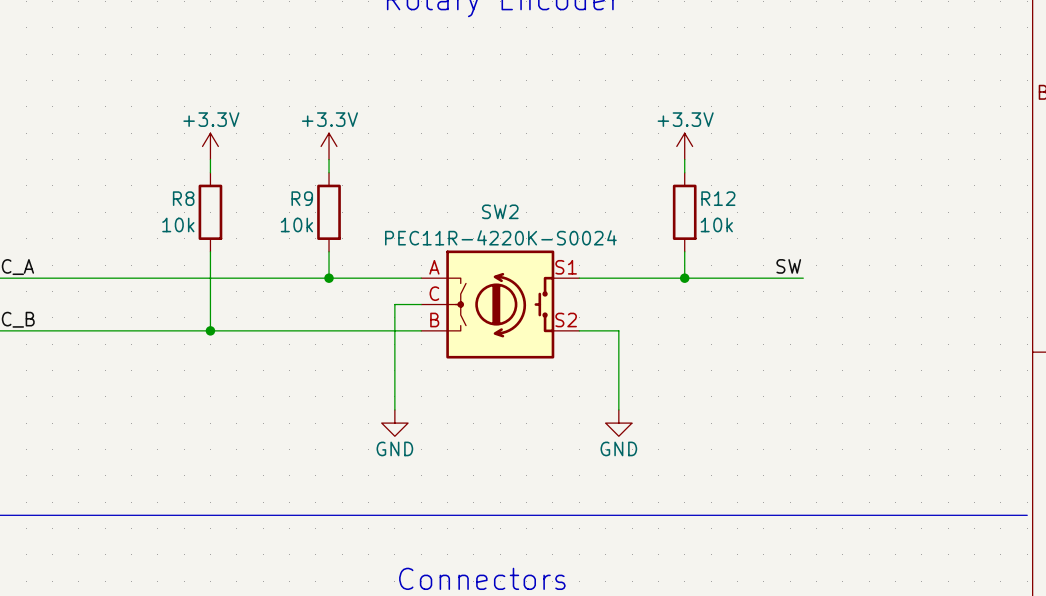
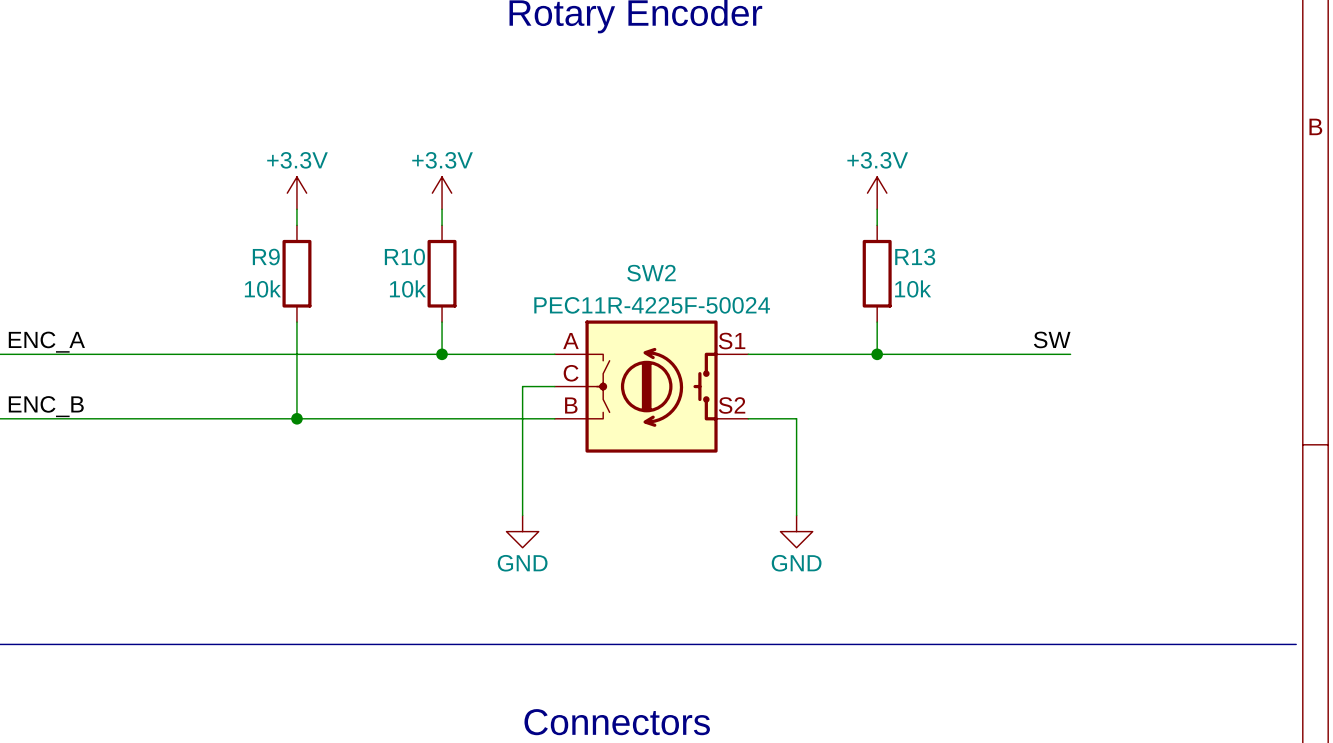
R8 name: R8 (183, 198) -> R9 (266, 257)
R9 name: R9 (302, 198) -> R10 (404, 257)
R12 name: R12 (718, 198) -> R13 (915, 257)
SW2 value: PEC11R-4220K-S0024 (500, 237) -> PEC11R-4225F-50024 (652, 305)
label position: SW (788, 266) -> SW (1052, 339)
wire: none -> (1022, 354) (1070, 354)

